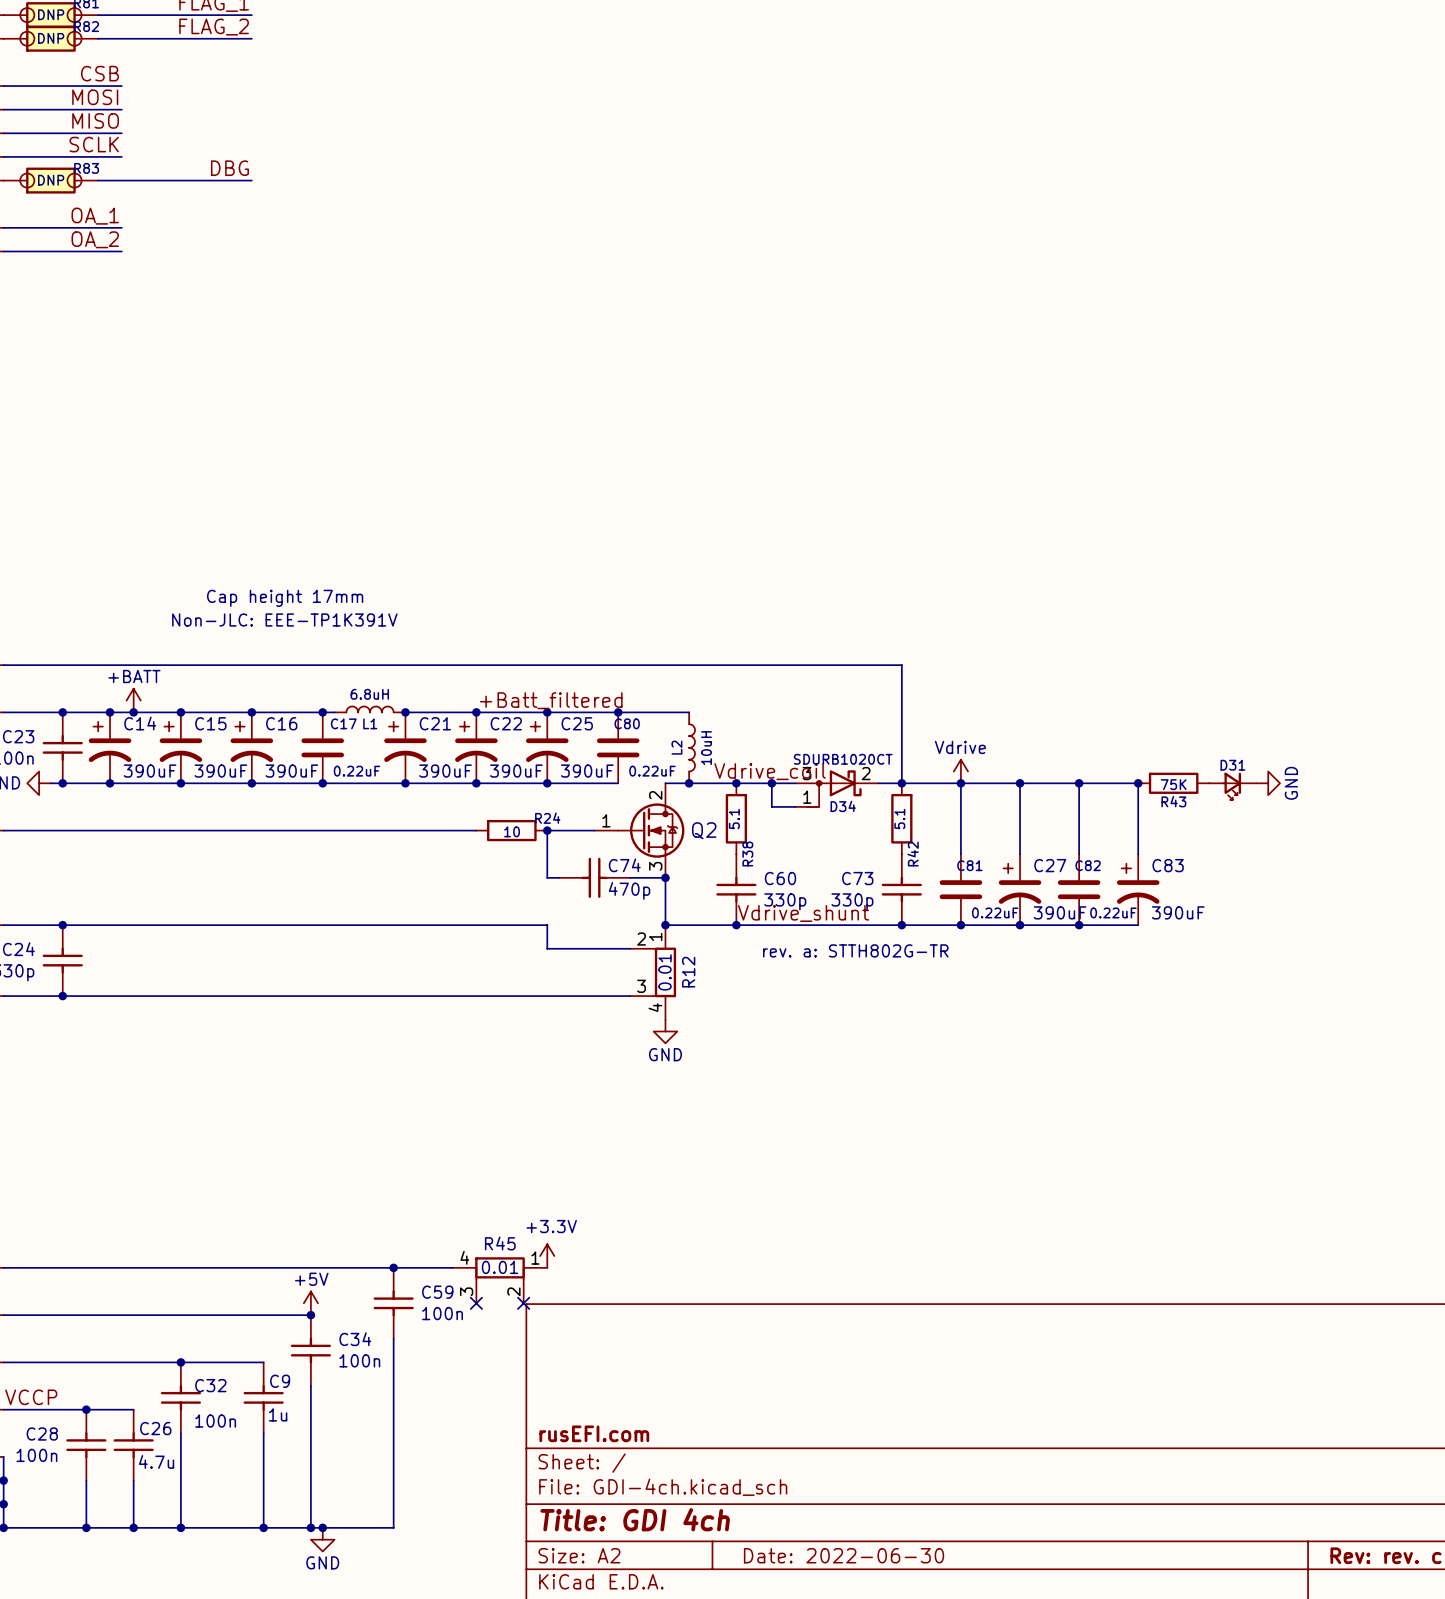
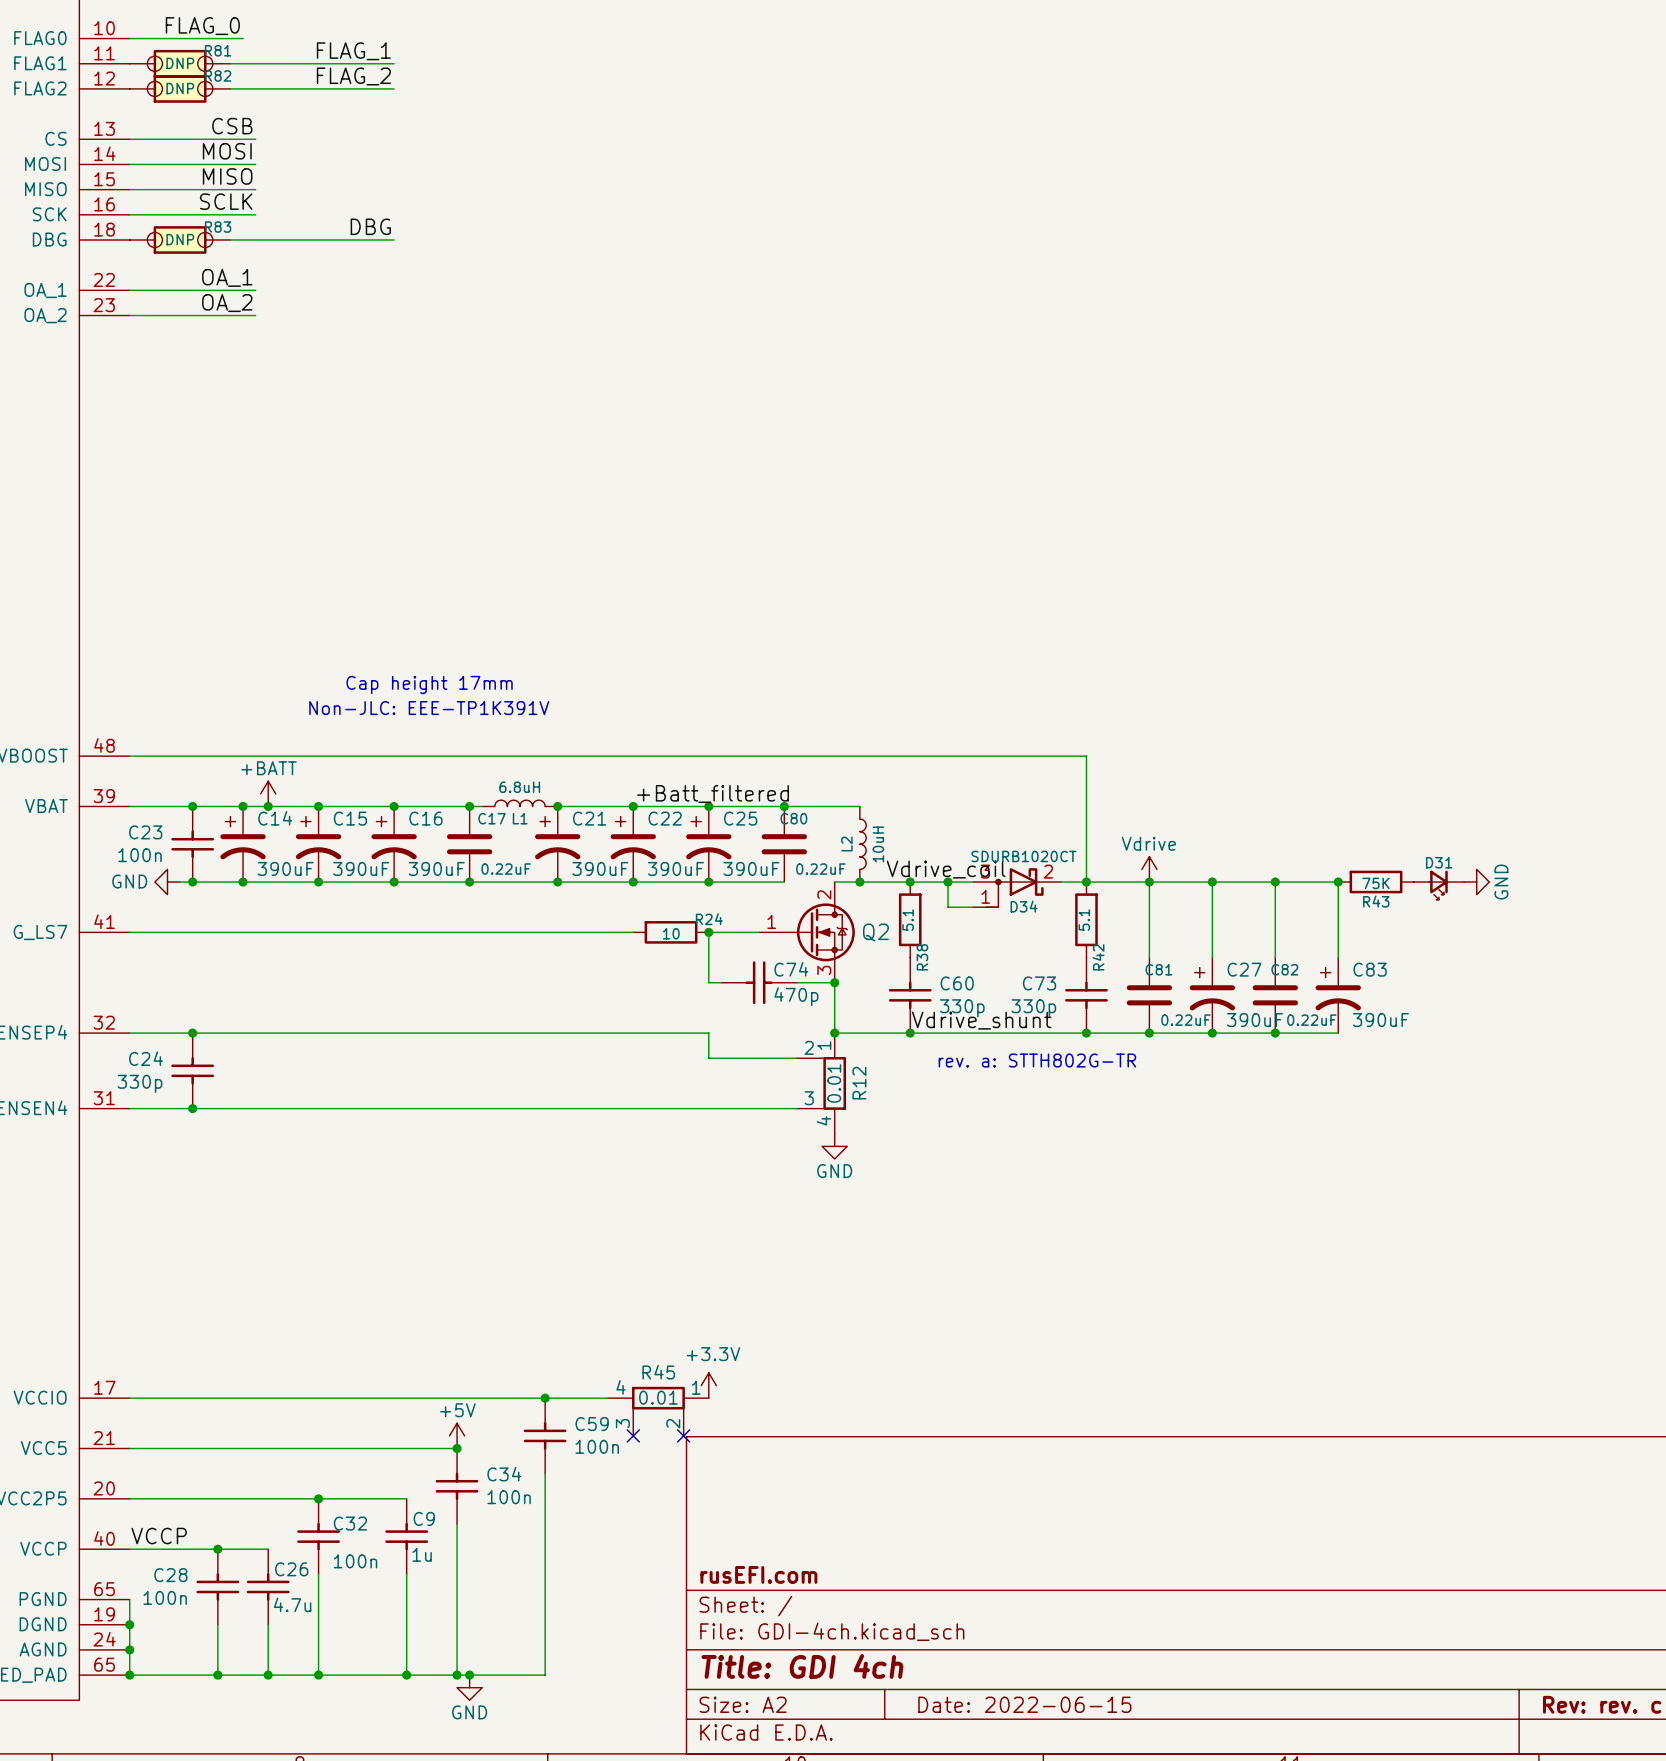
title block: Date: 2022-06-30 (844, 1555) -> Date: 2022-06-15 (1024, 1704)

